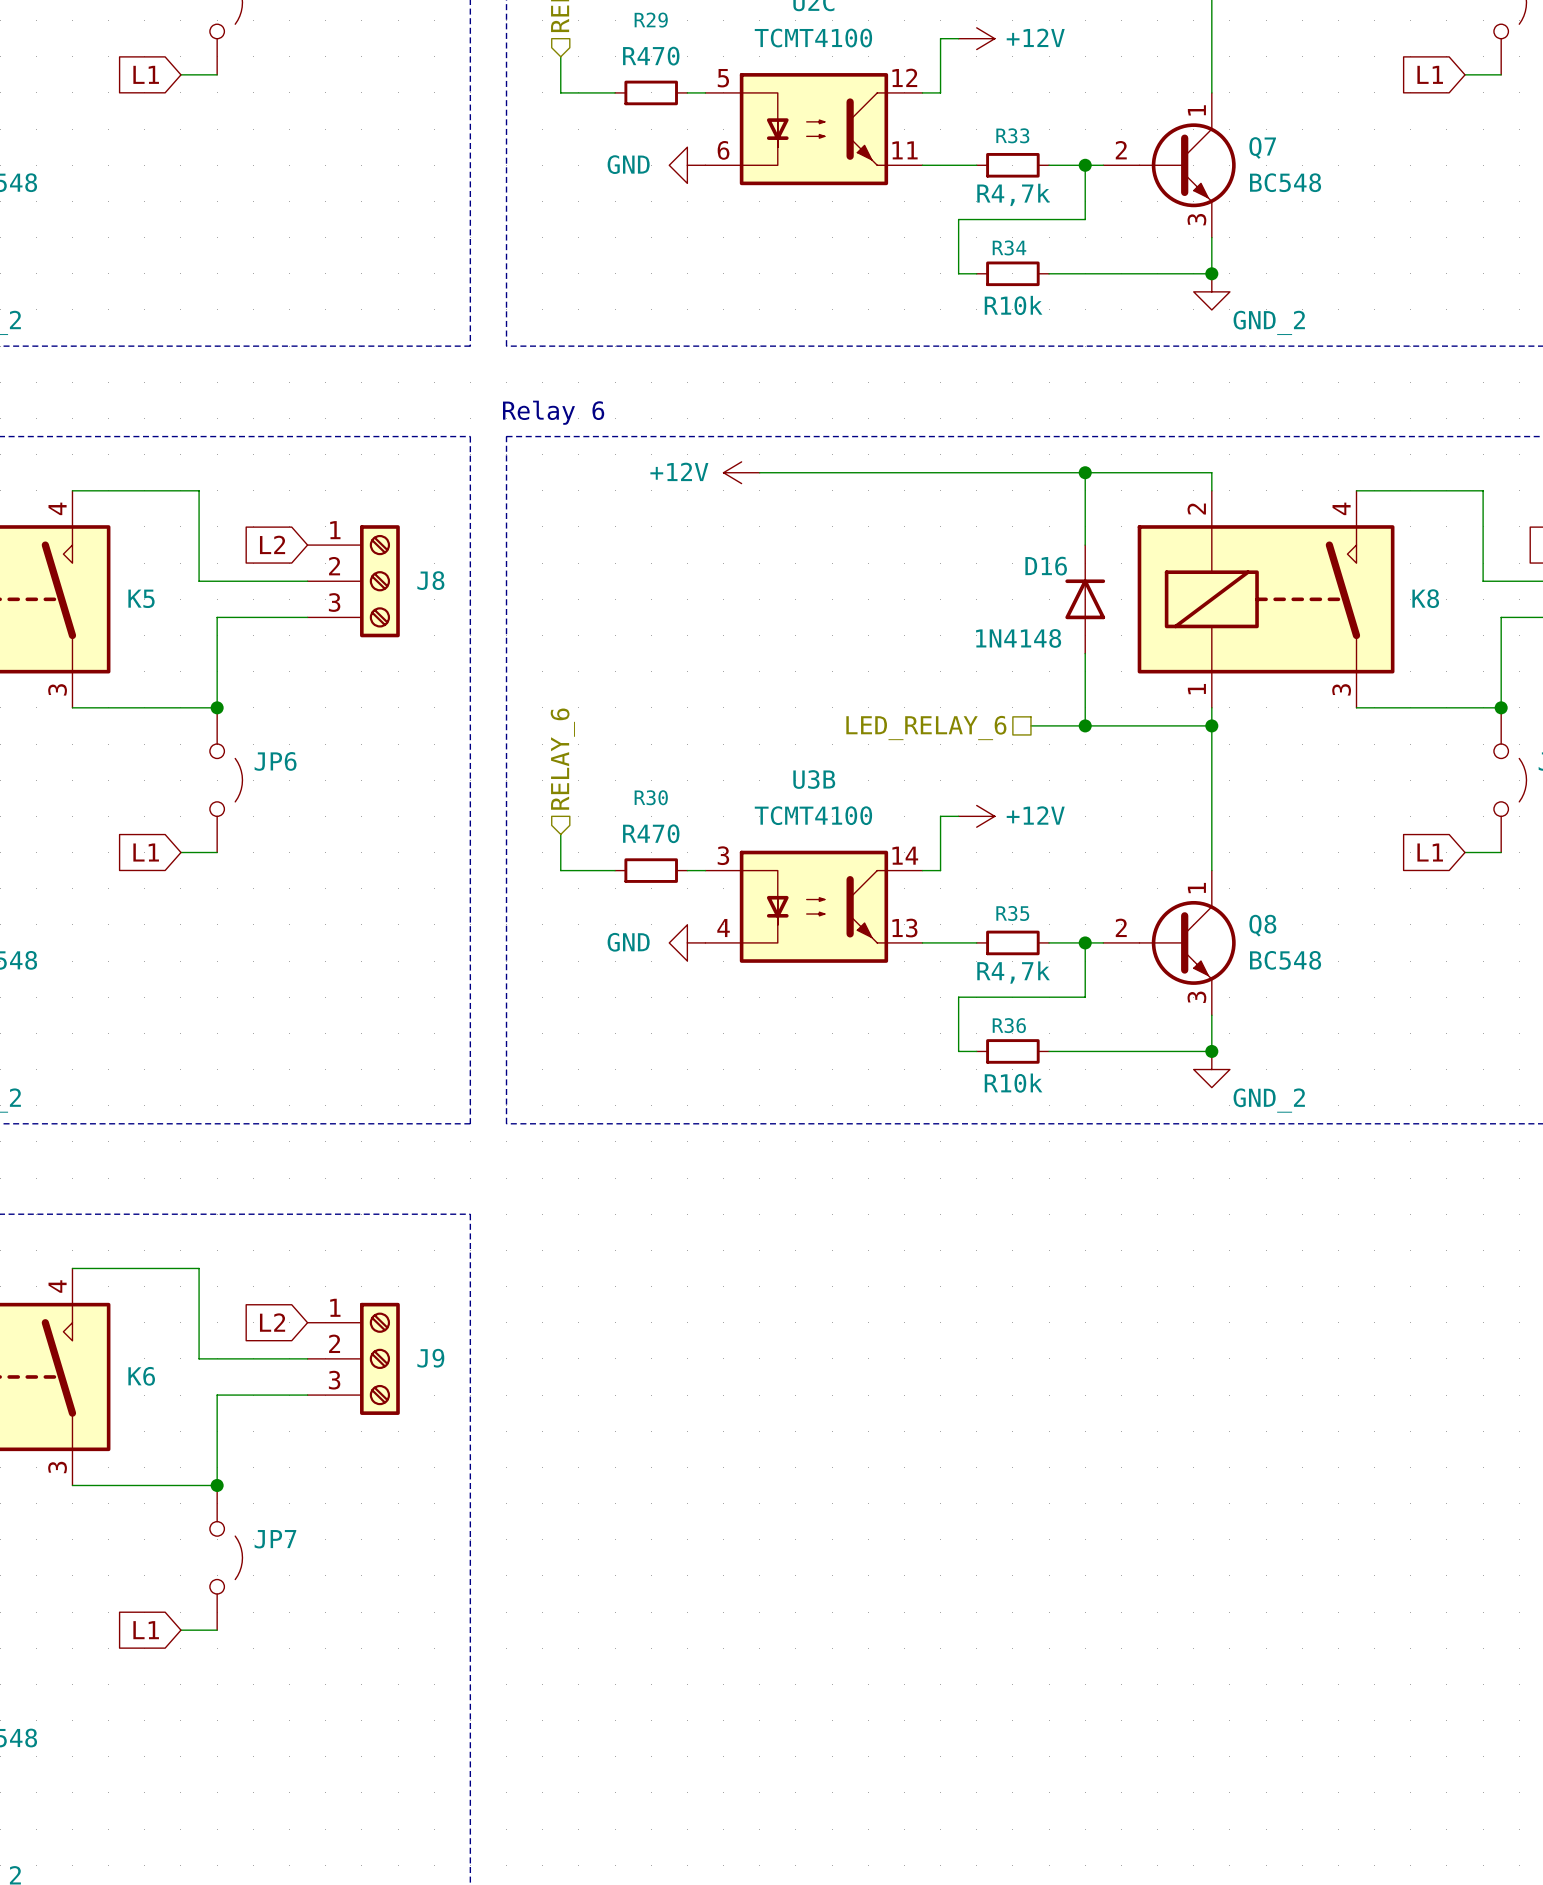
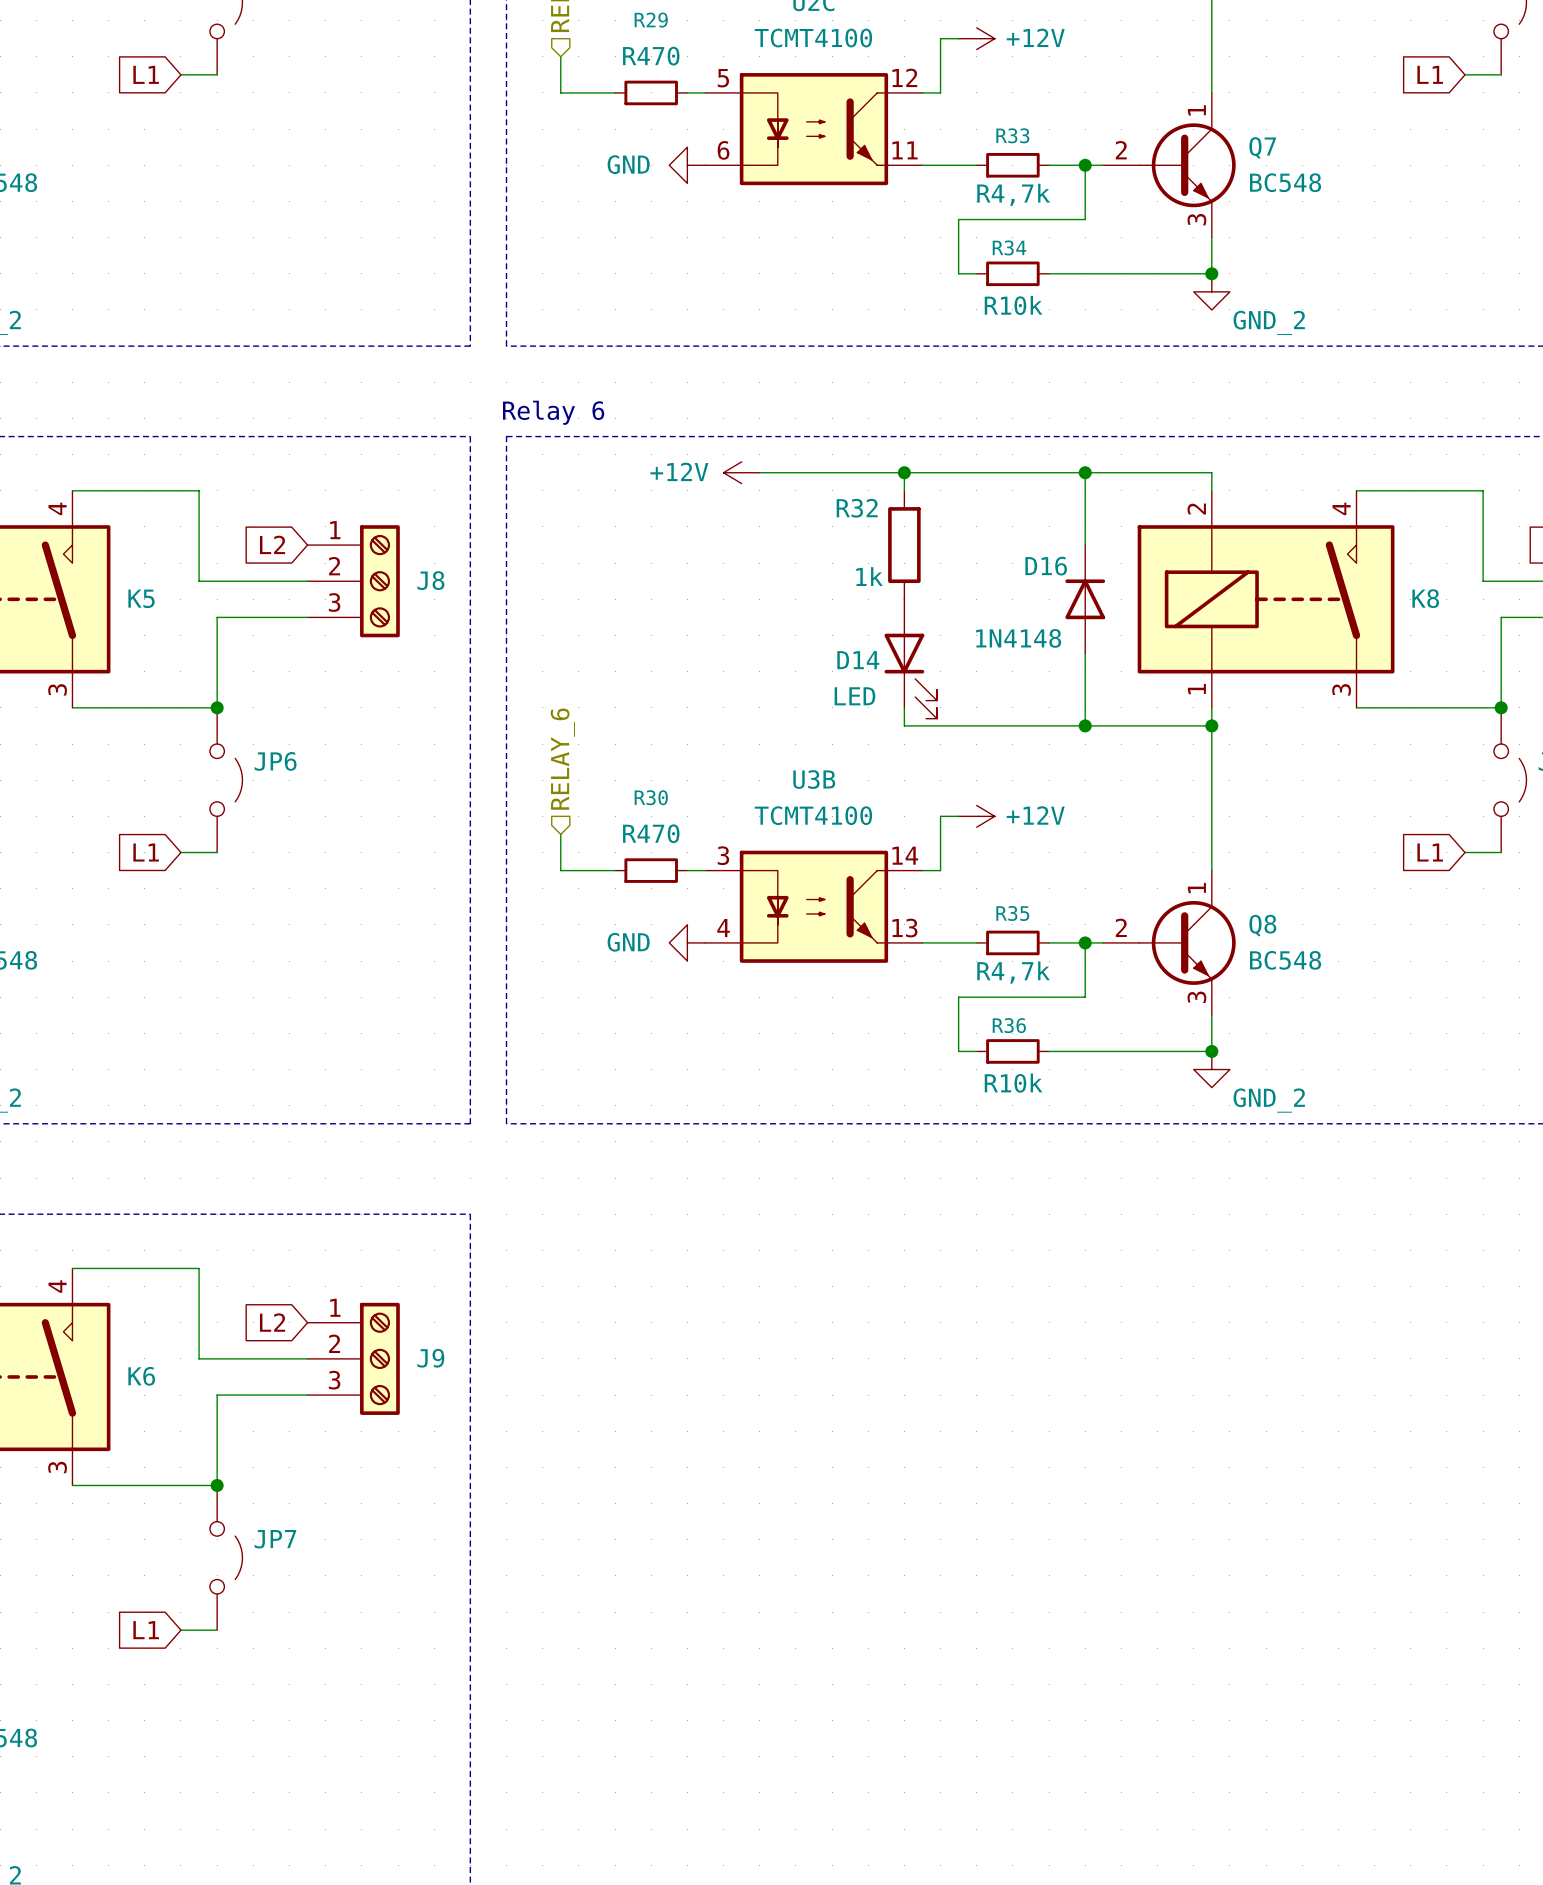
wire: none -> (904, 472) (904, 490)
junction: none -> (904, 472)
R32: none -> 1k (904, 545)
D14: none -> LED (910, 659)
wire: none -> (904, 707) (904, 725) (1030, 725)
hierarchical label: LED_RELAY_6 (926, 728) -> none

